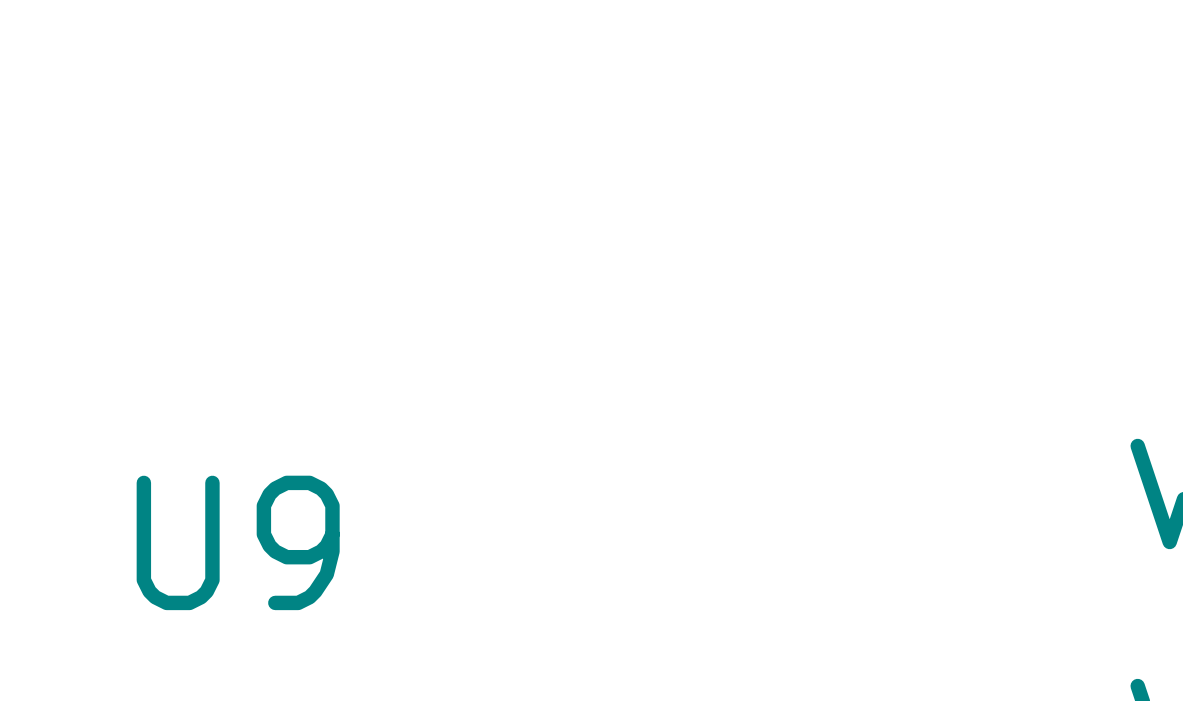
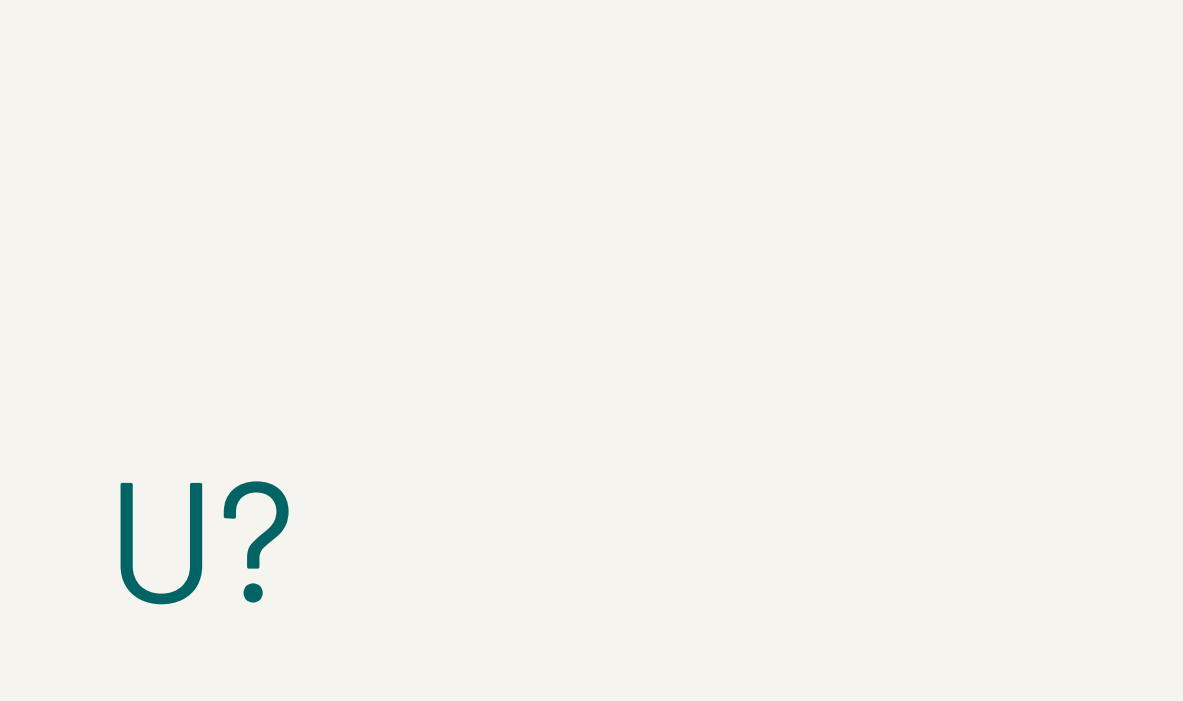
U9 name: U9 (238, 542) -> U? (204, 542)

